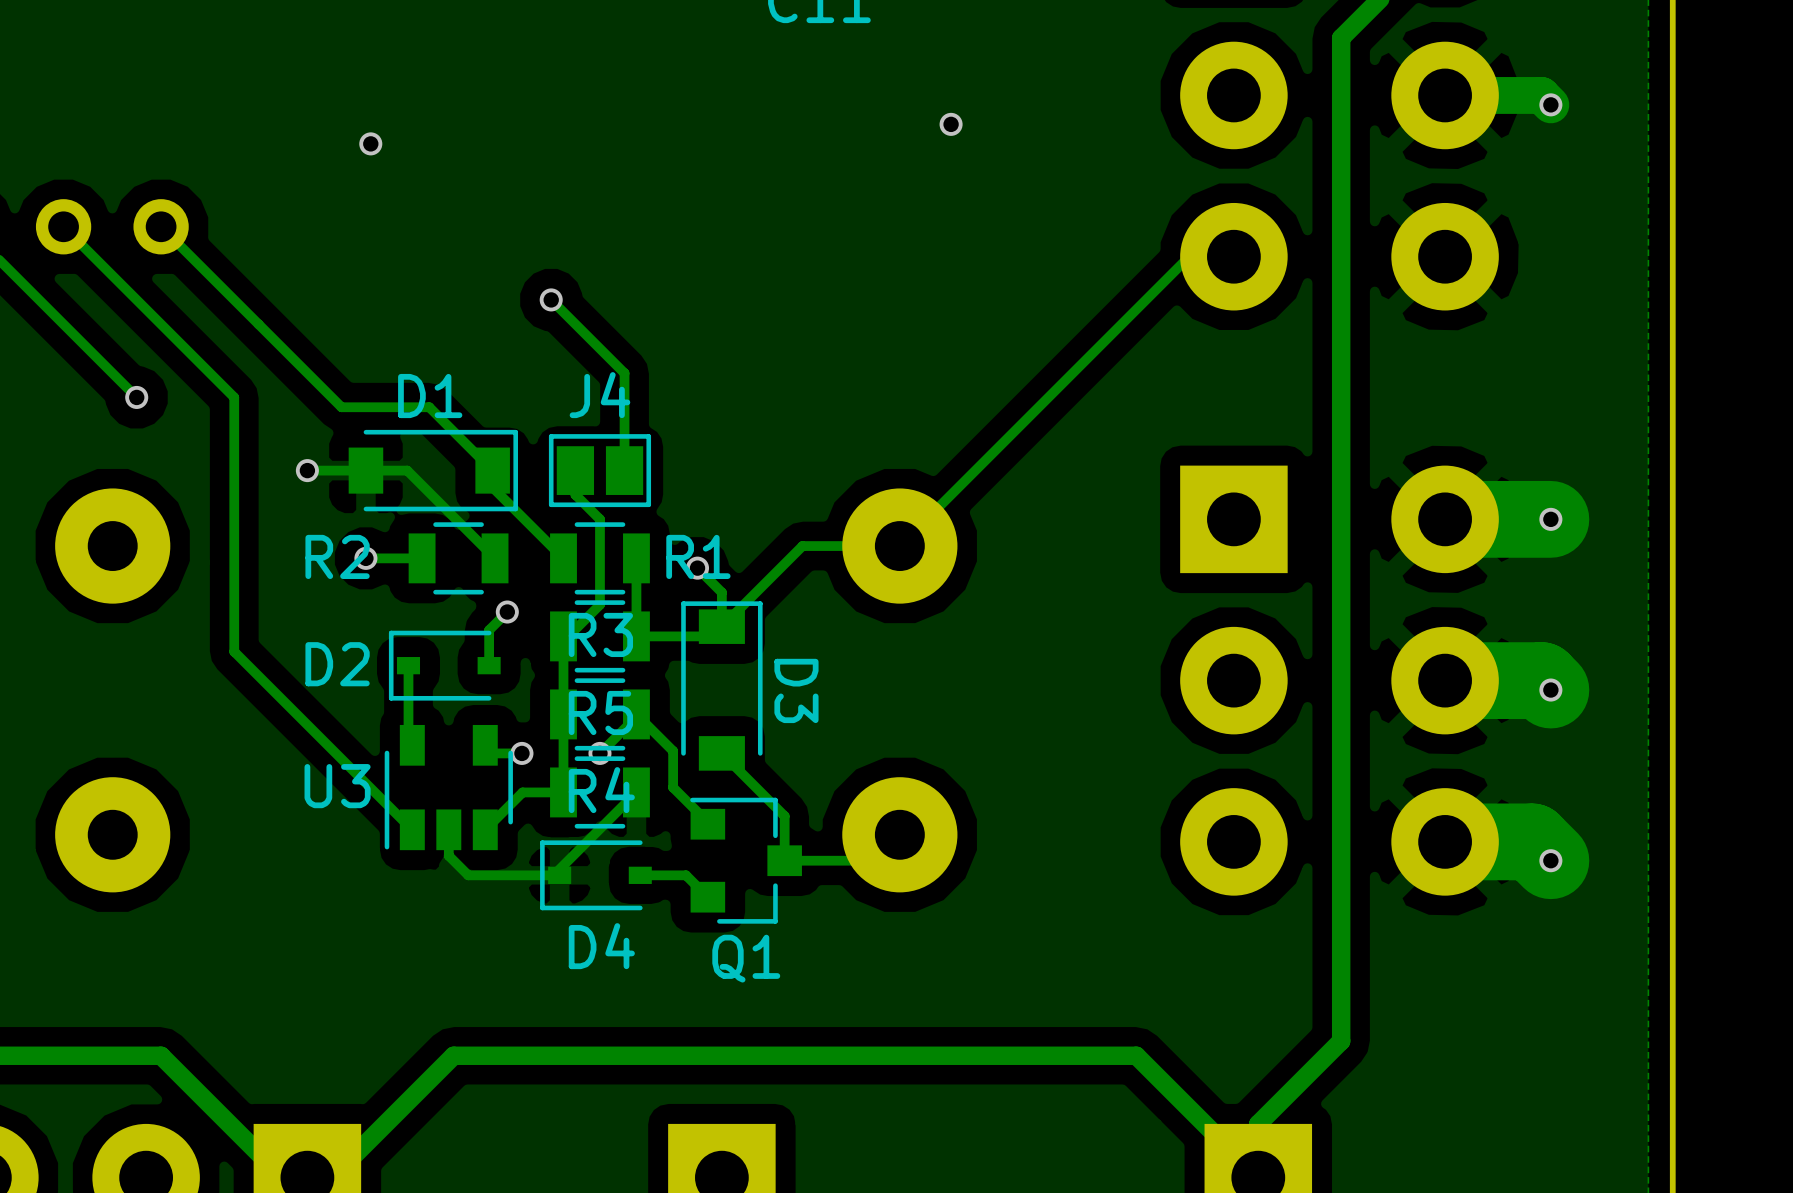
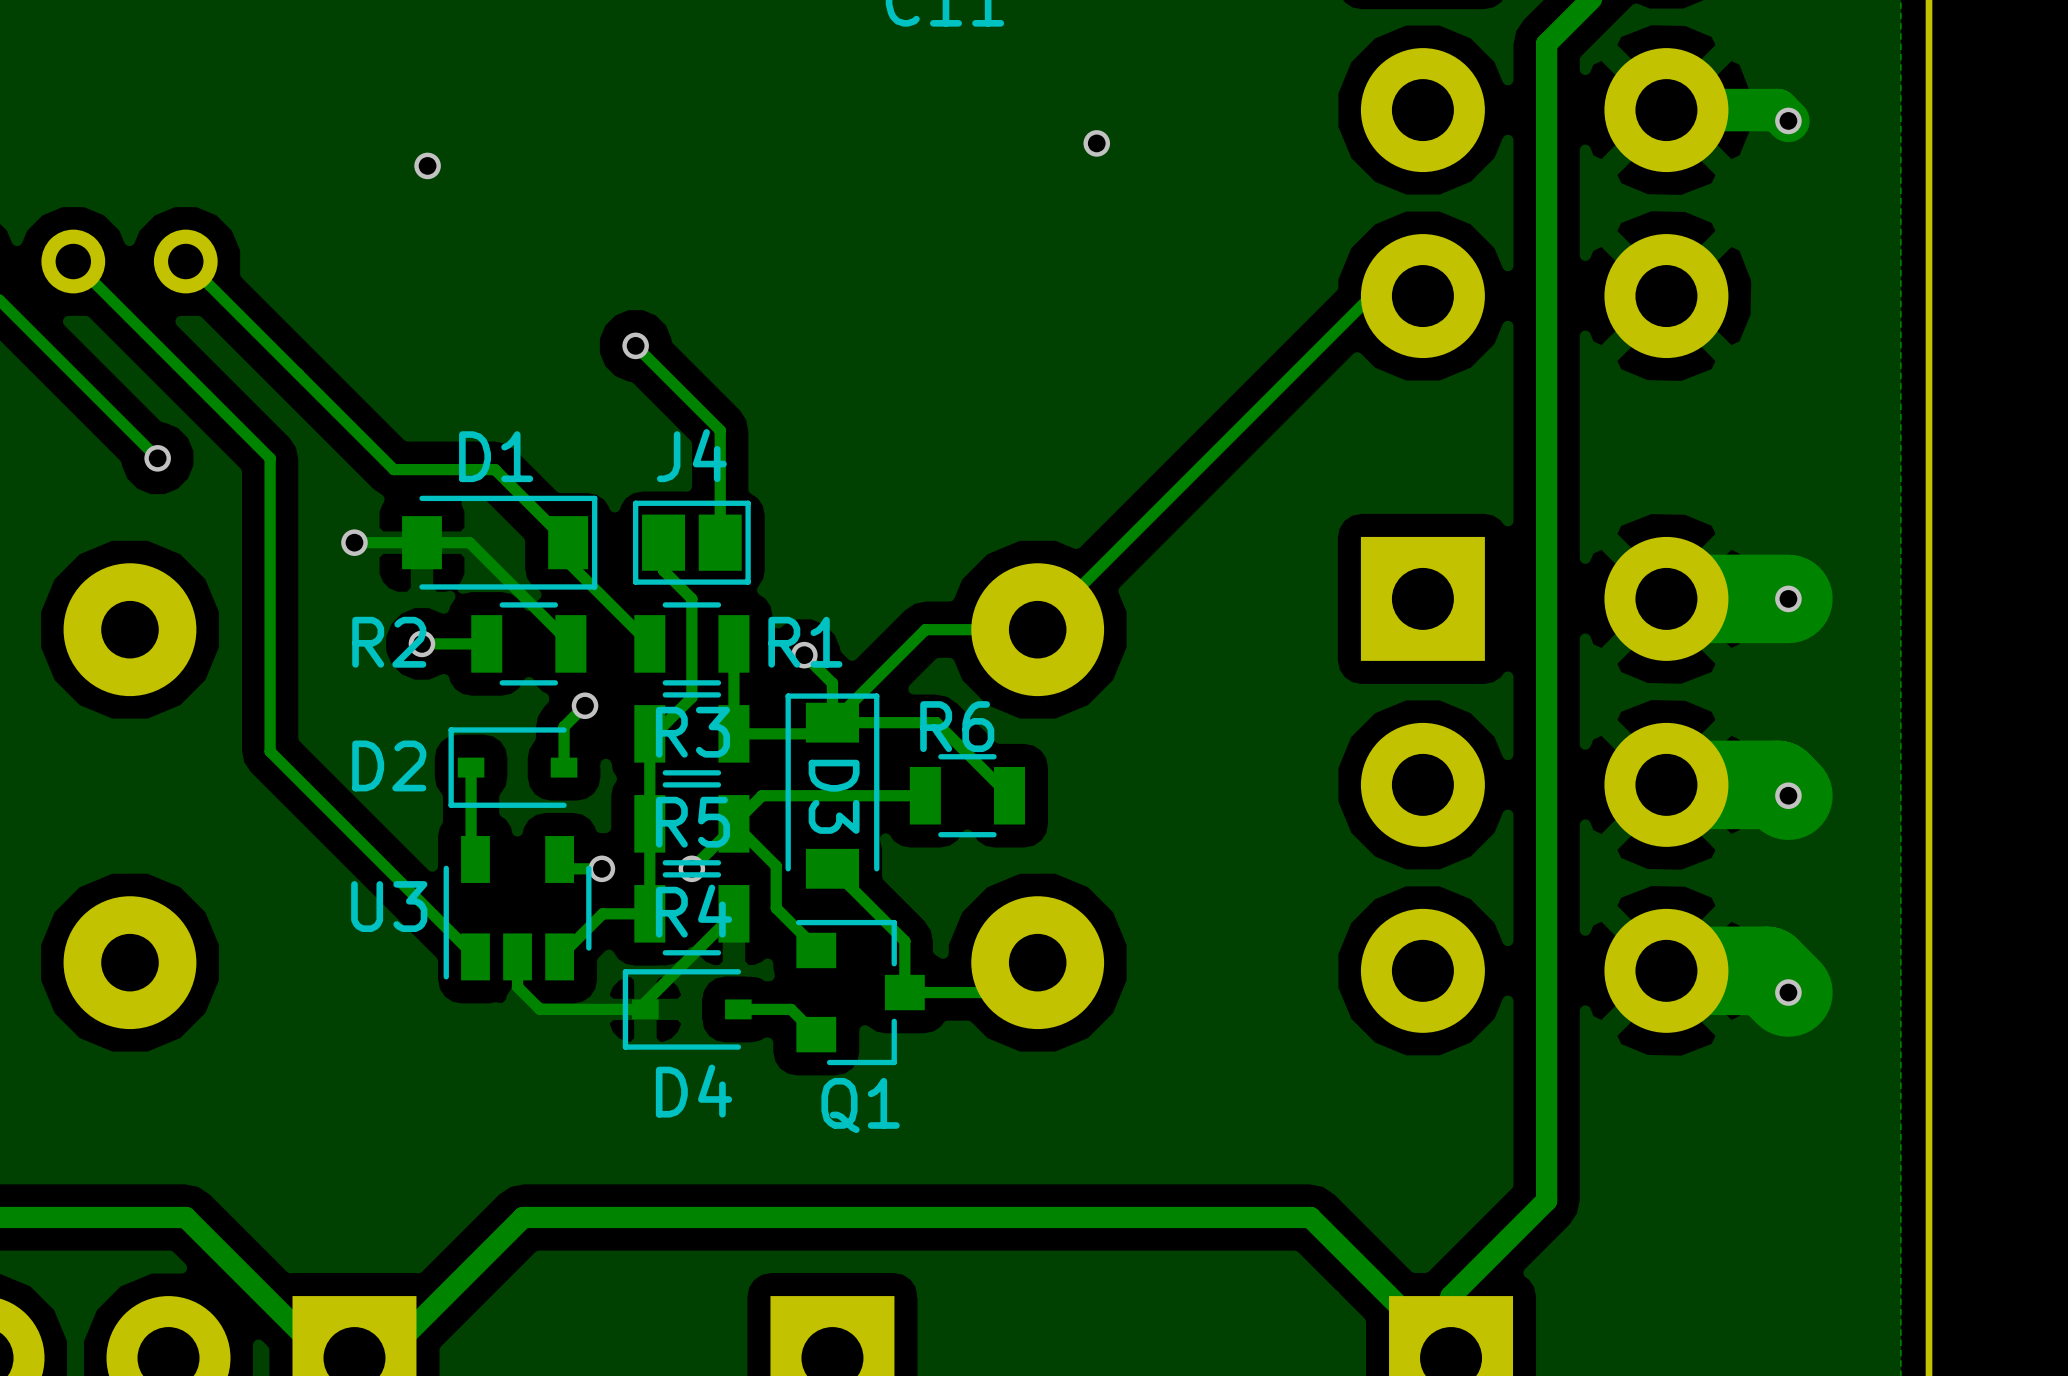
track: none -> (832, 722) (936, 722) (1009, 795)
D3 name position: D3 (796, 690) -> D3 (834, 796)
track: none -> (925, 795) (762, 795) (733, 823)
R6: none -> (967, 795)

